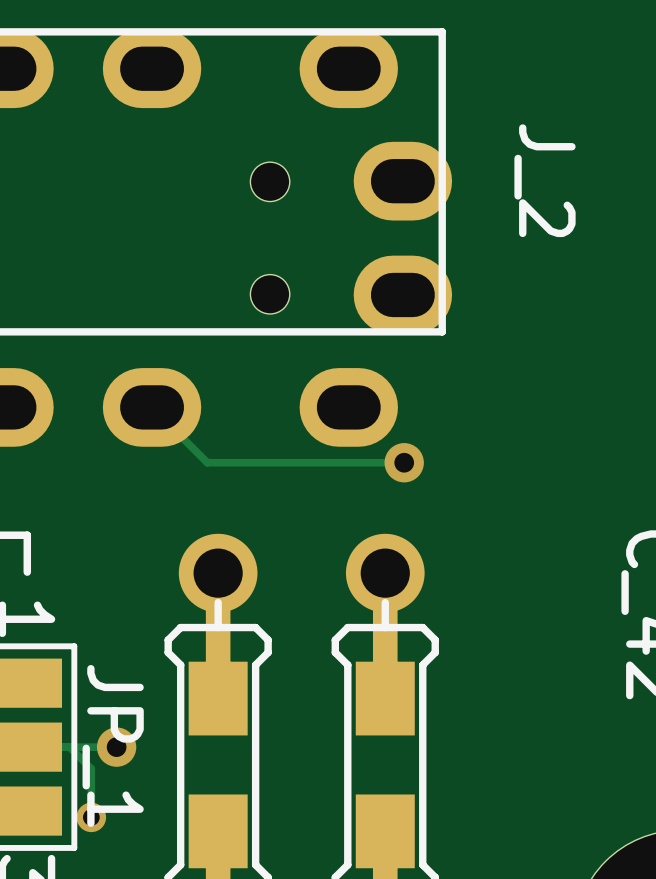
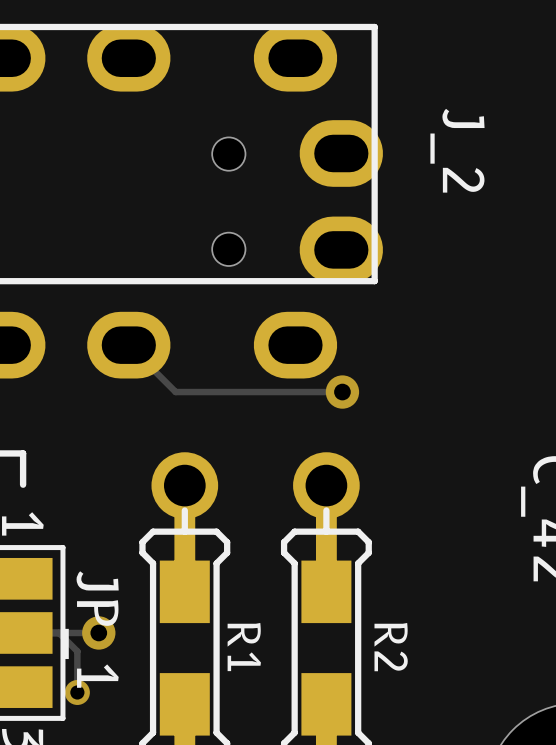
R1 name: none -> R1 (244, 647)
R2 name: none -> R2 (391, 647)

